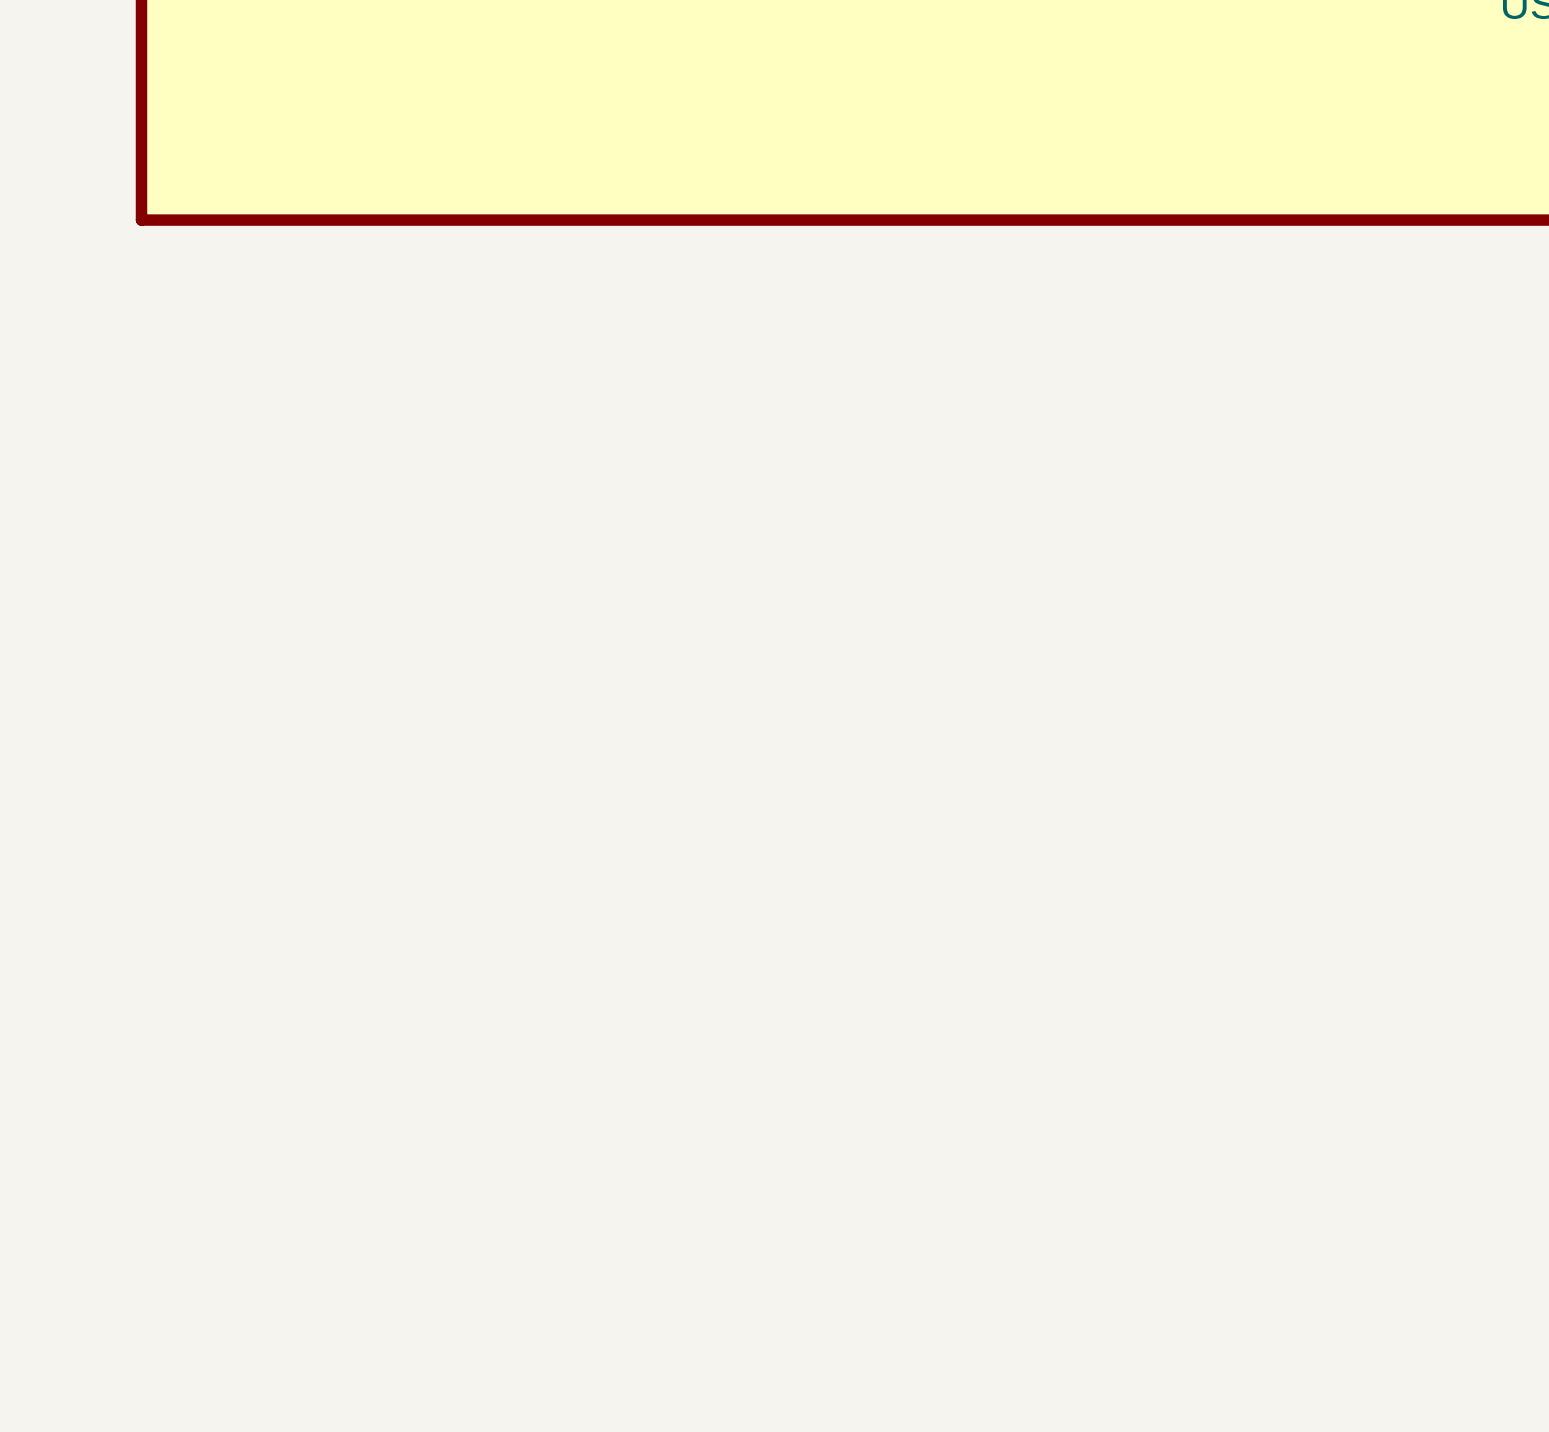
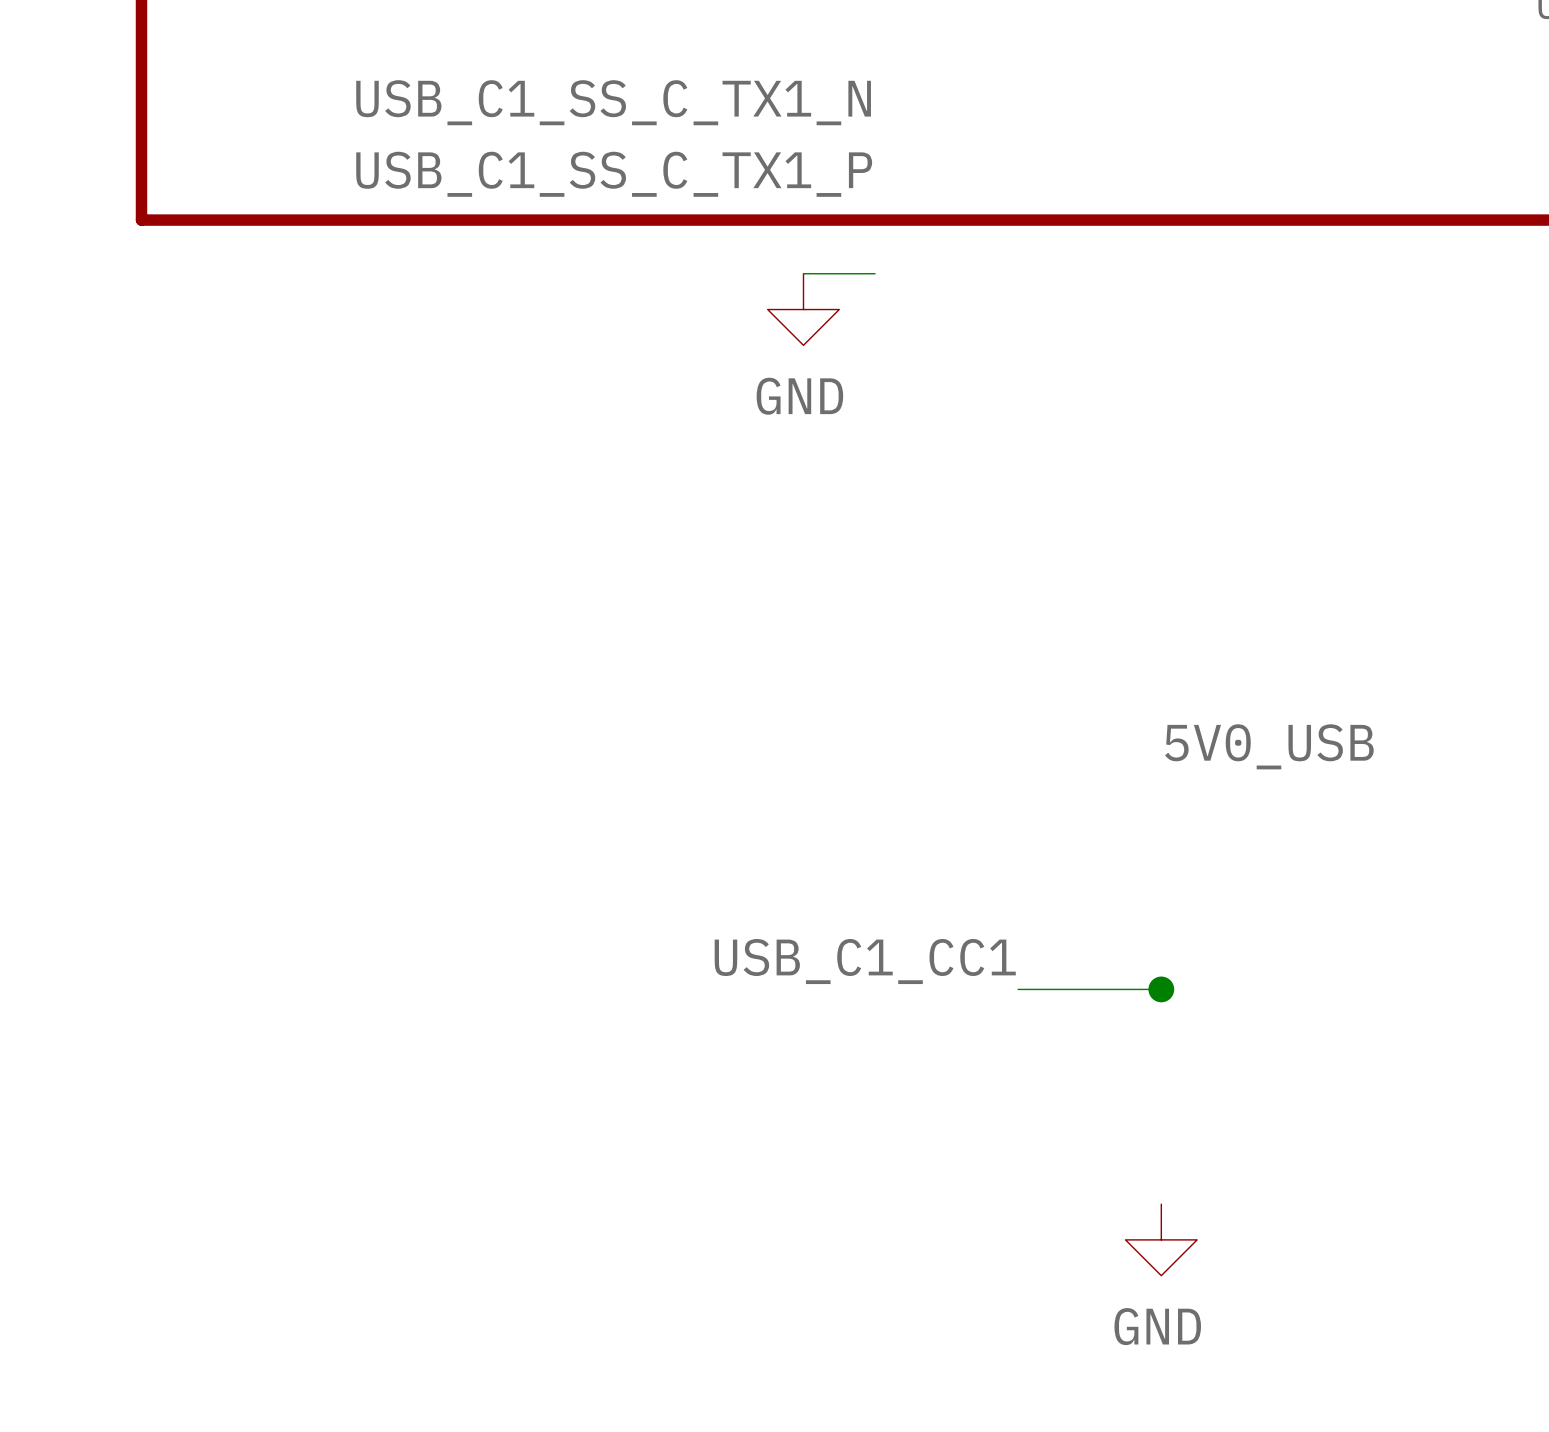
label: none -> USB_C1_SS_C_TX1_N (613, 102)
label: none -> USB_C1_SS_C_TX1_P (614, 174)
wire: none -> (803, 273) (875, 273)
power symbol: none -> GND (803, 309)
label: none -> 5V0_USB (1269, 746)
label: none -> USB_C1_CC1 (865, 961)
wire: none -> (1018, 989) (1161, 989)
junction: none -> (1161, 989)
power symbol: none -> GND (1161, 1239)

